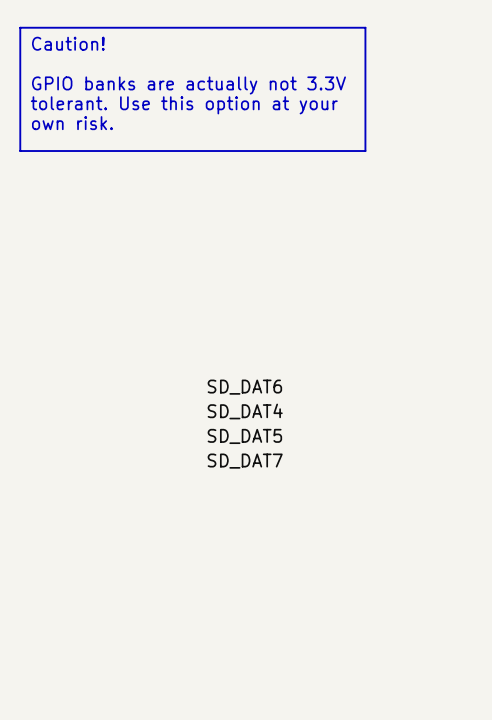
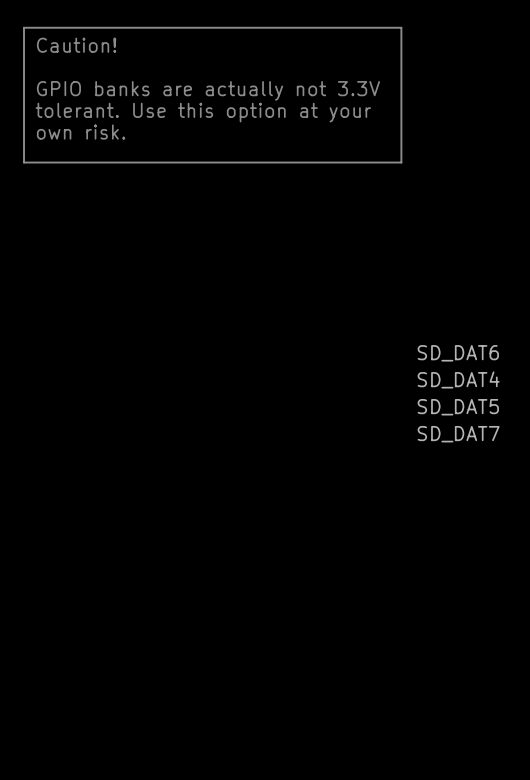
label position: SD_DAT6 (244, 387) -> SD_DAT6 (458, 353)
label position: SD_DAT4 (245, 411) -> SD_DAT4 (458, 379)
label position: SD_DAT5 (244, 436) -> SD_DAT5 (458, 407)
label position: SD_DAT7 (245, 461) -> SD_DAT7 (458, 434)

